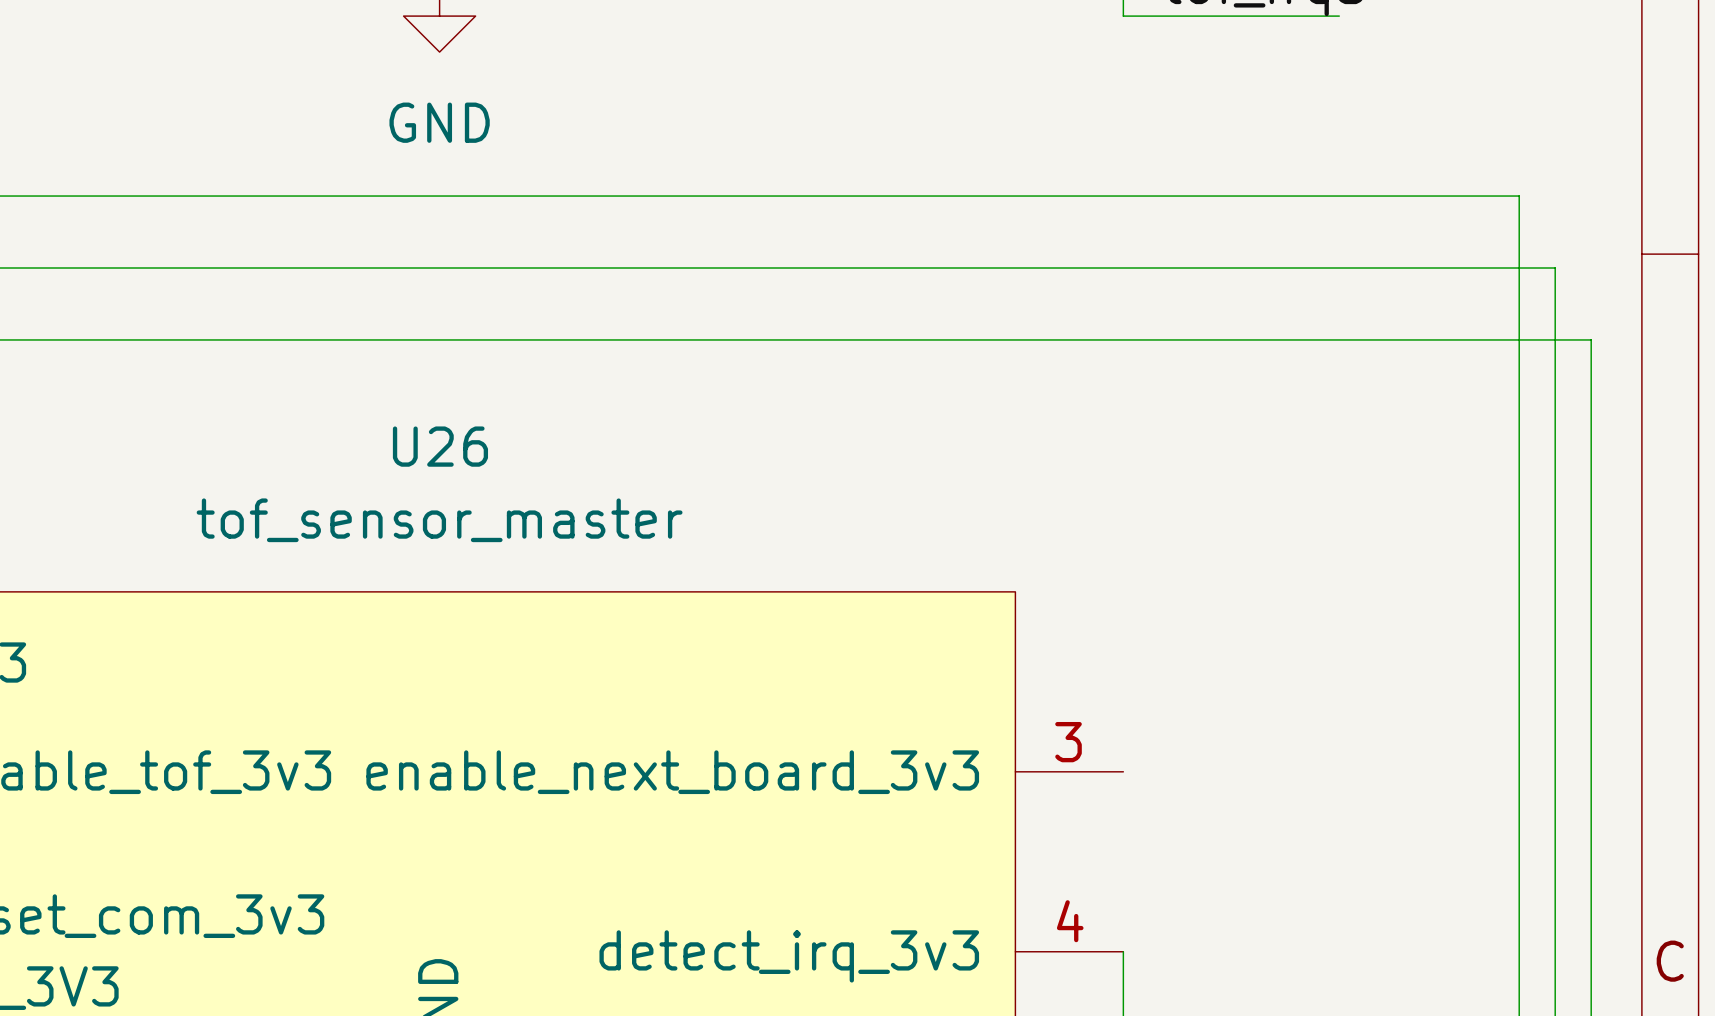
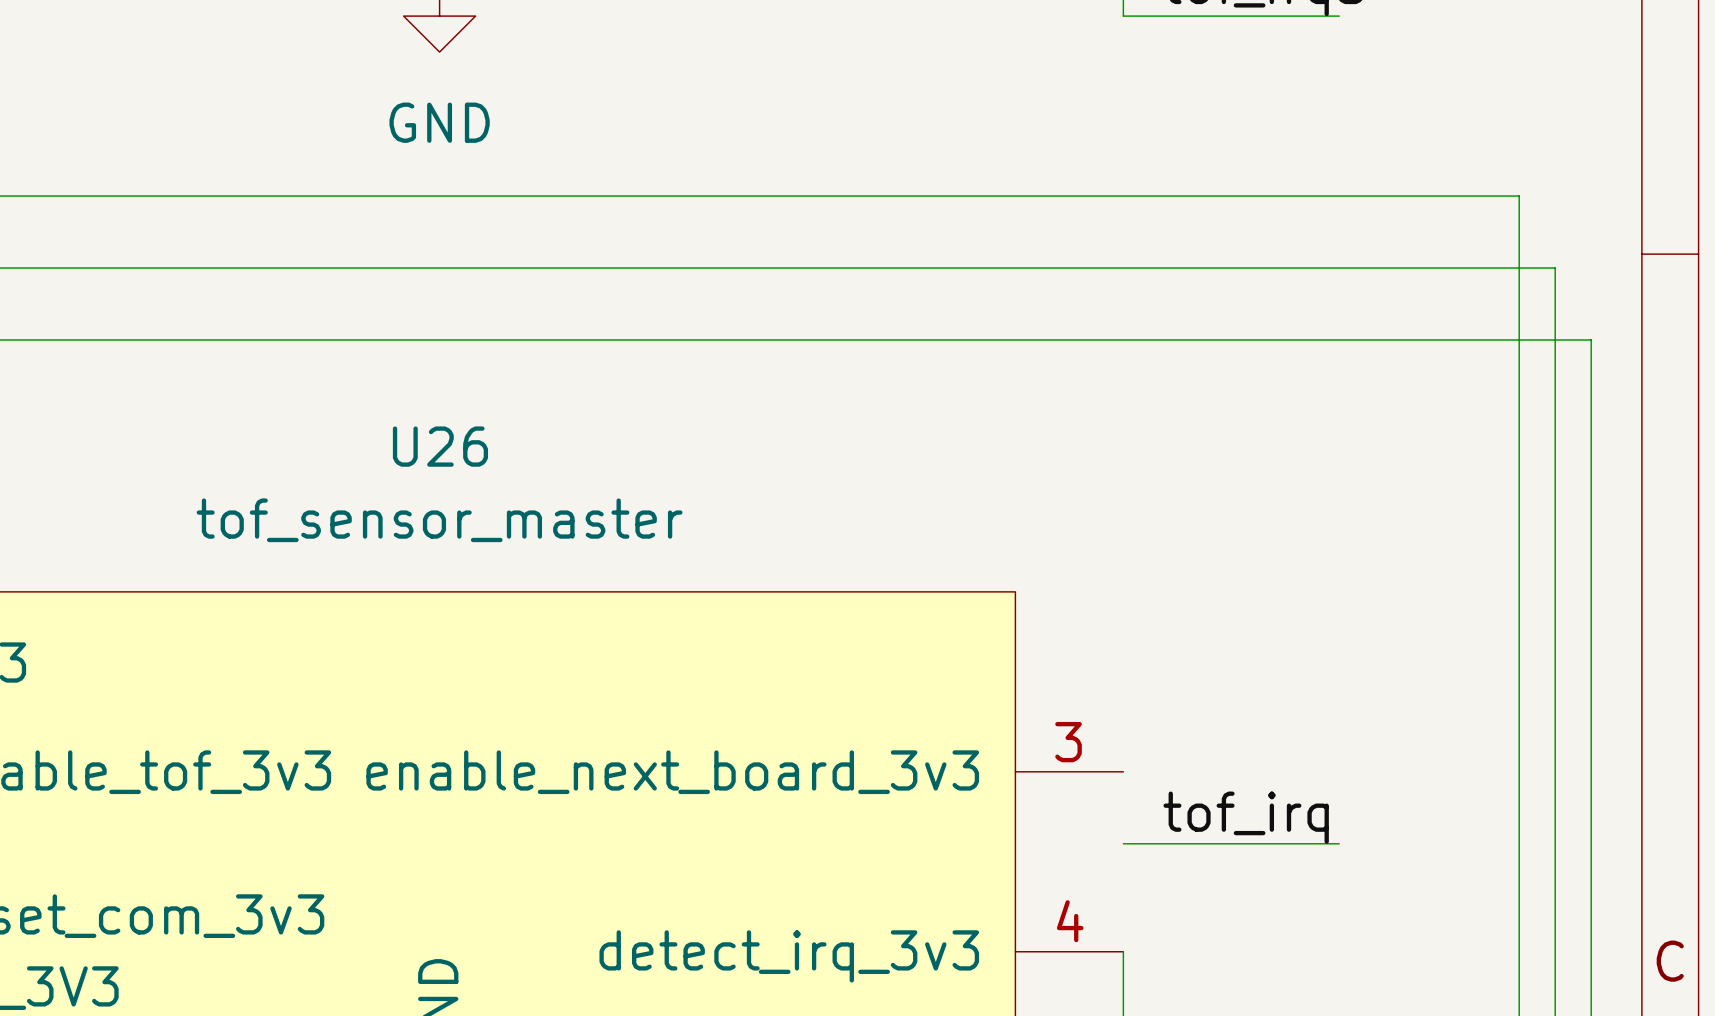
label: none -> tof_irq (1246, 817)
wire: none -> (1123, 843) (1339, 843)

